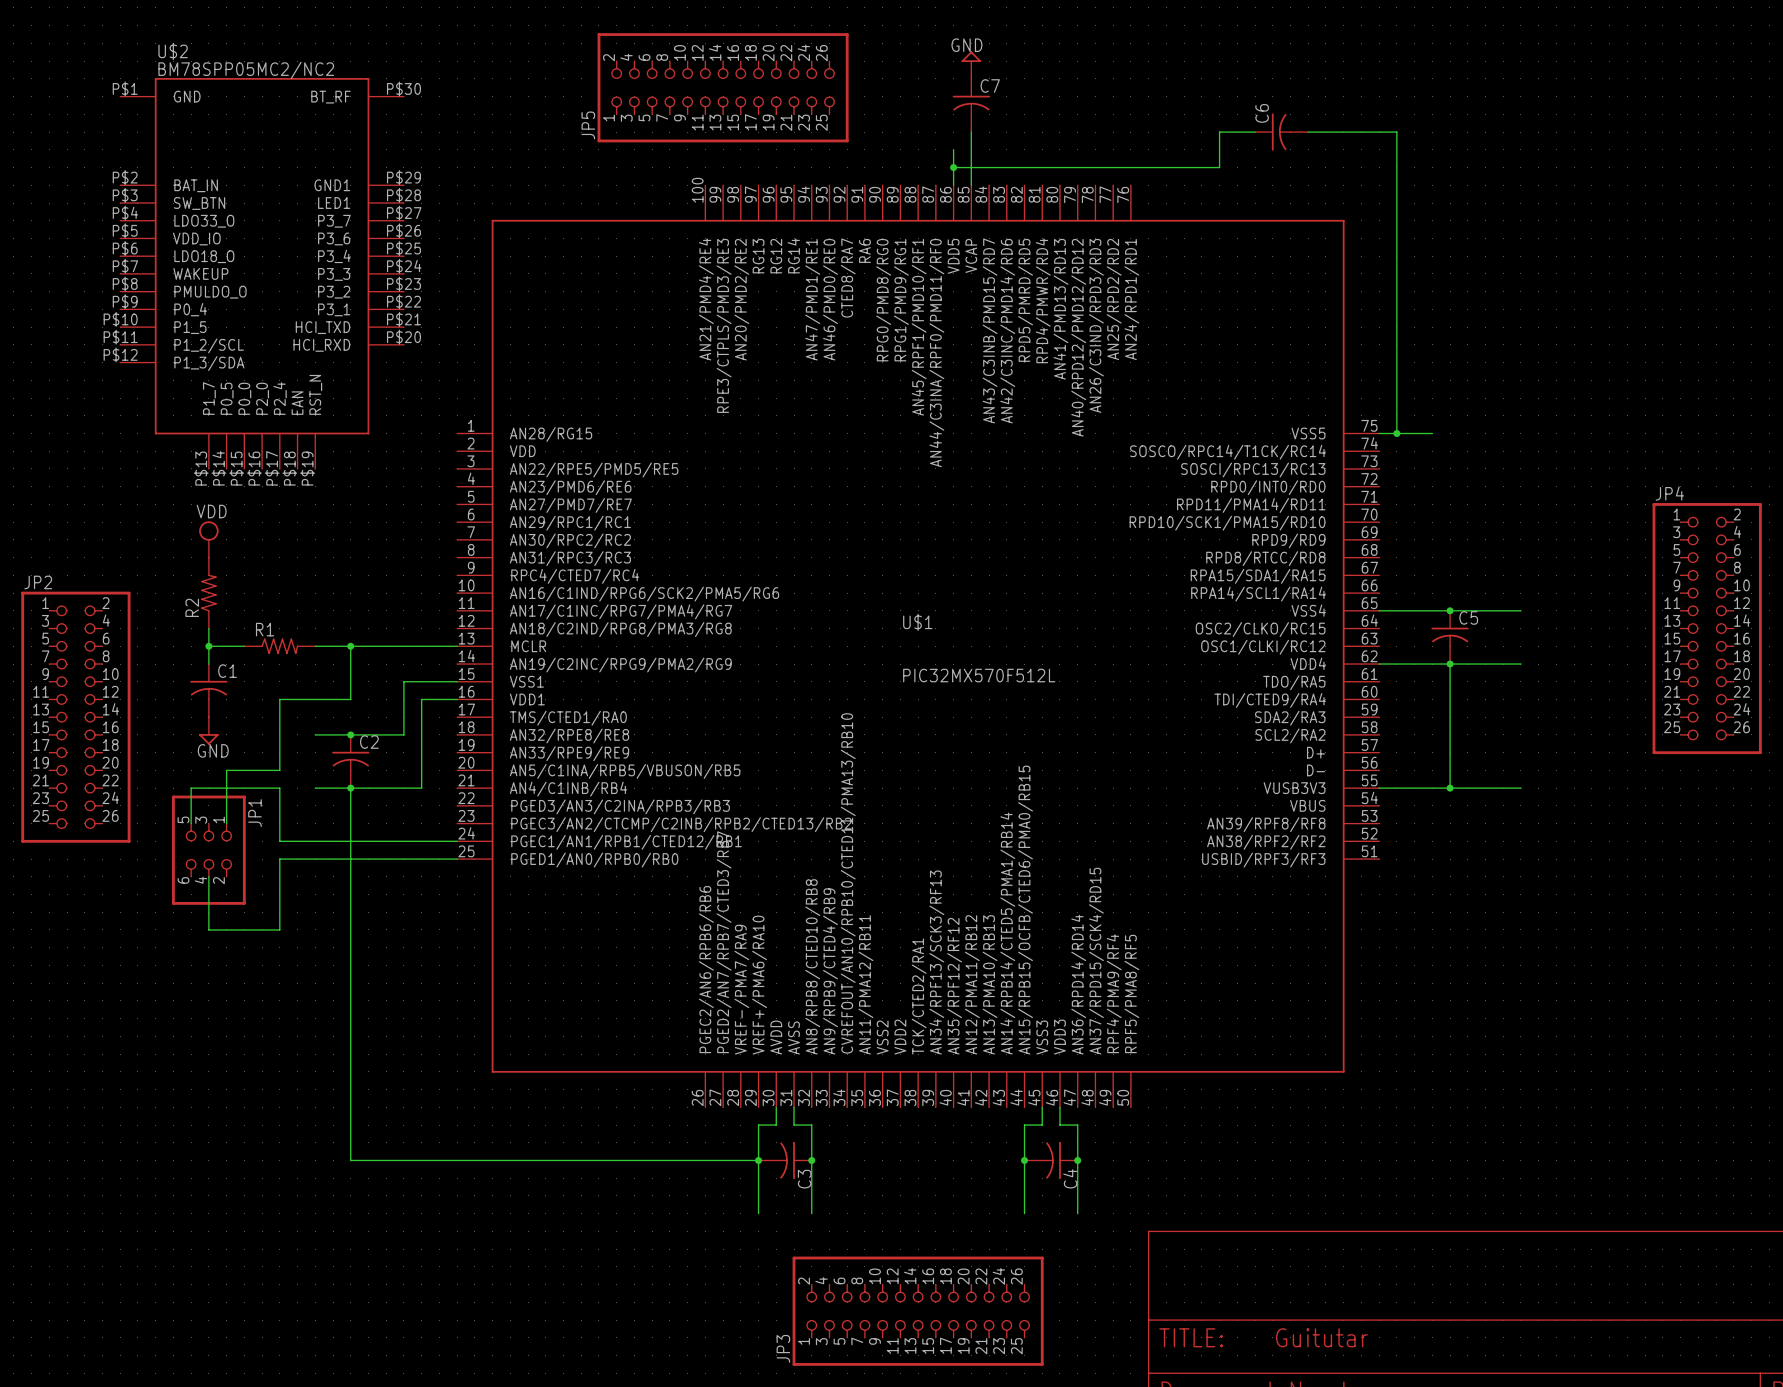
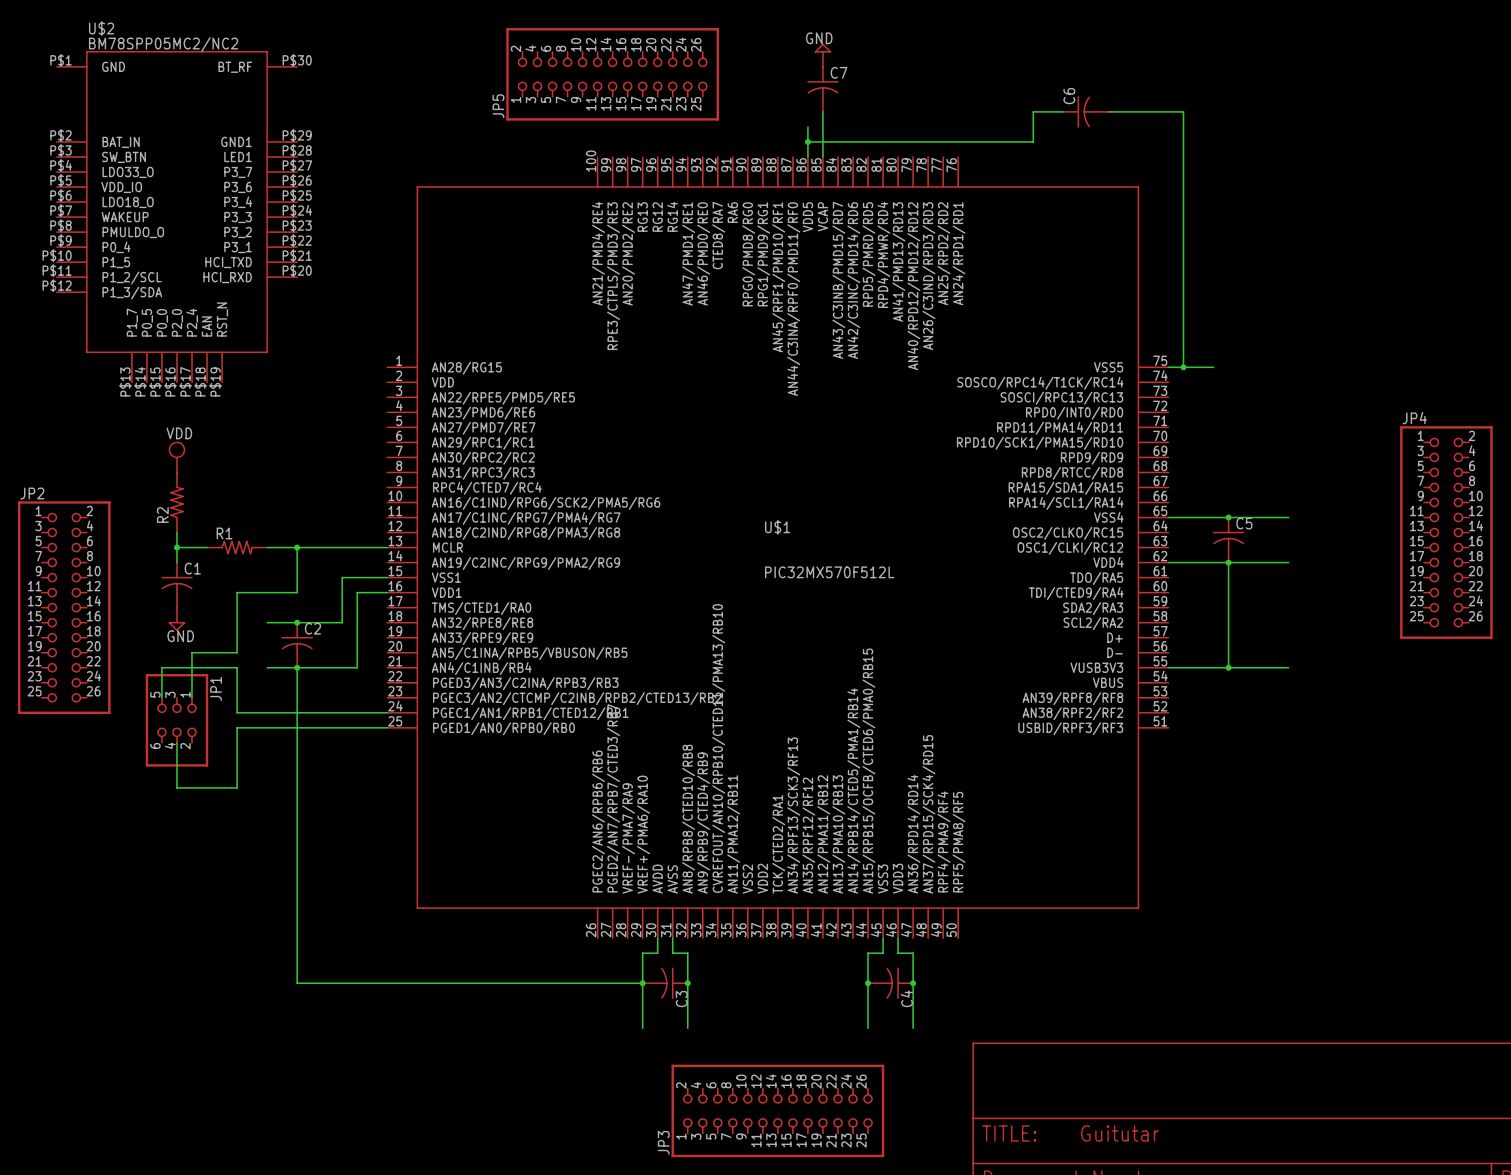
U$2 position: (262, 273) -> (176, 216)

